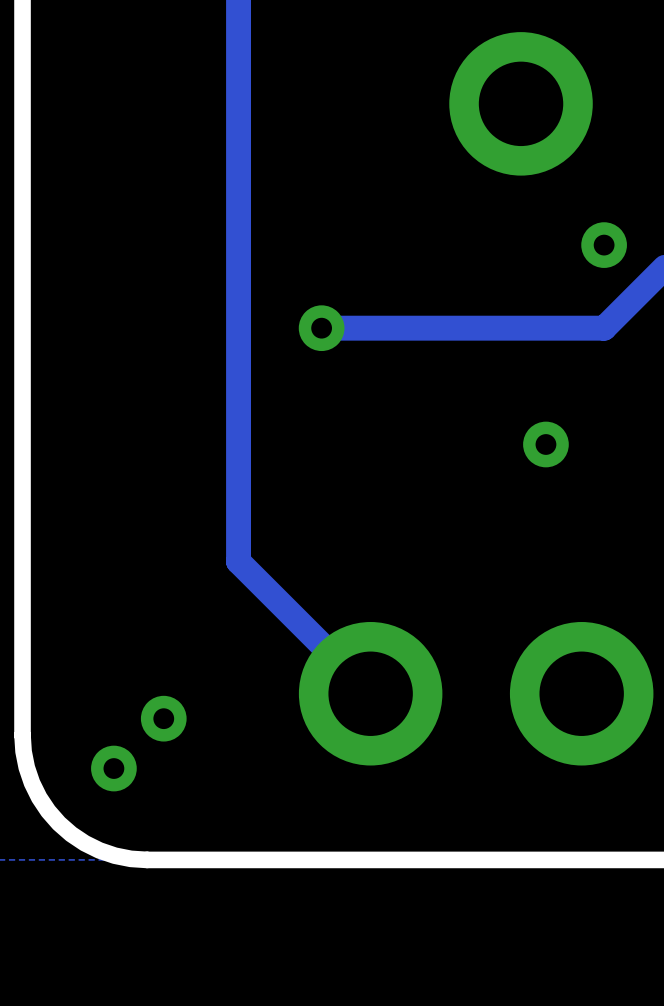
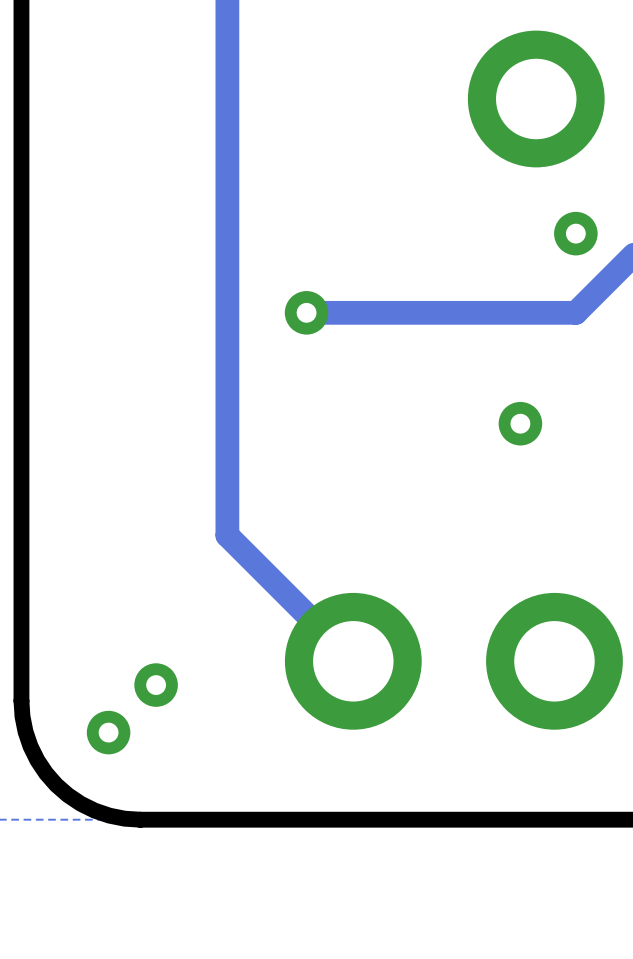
via position: (521, 103) -> (536, 98)

